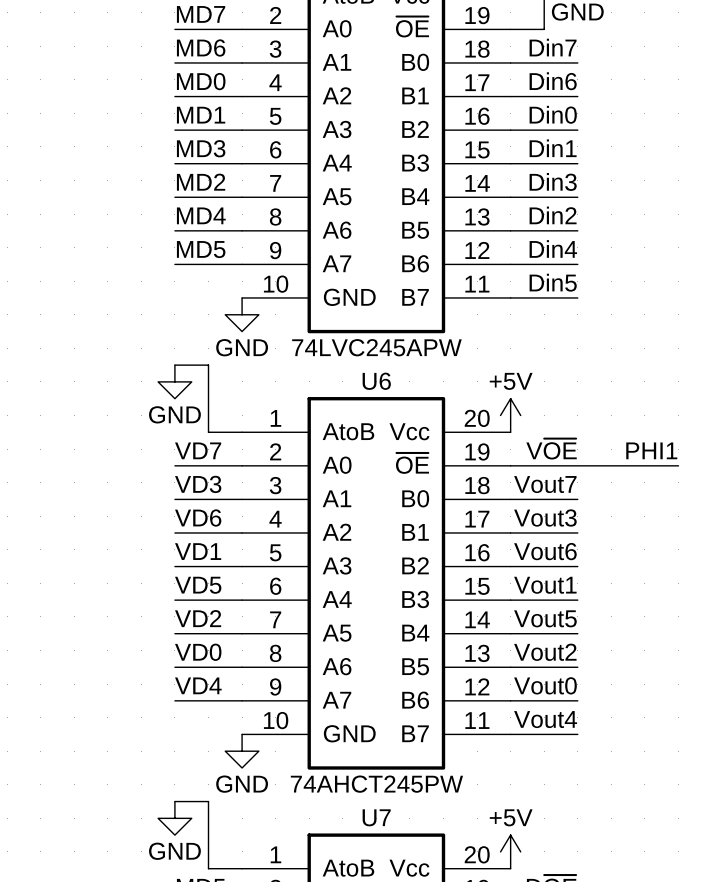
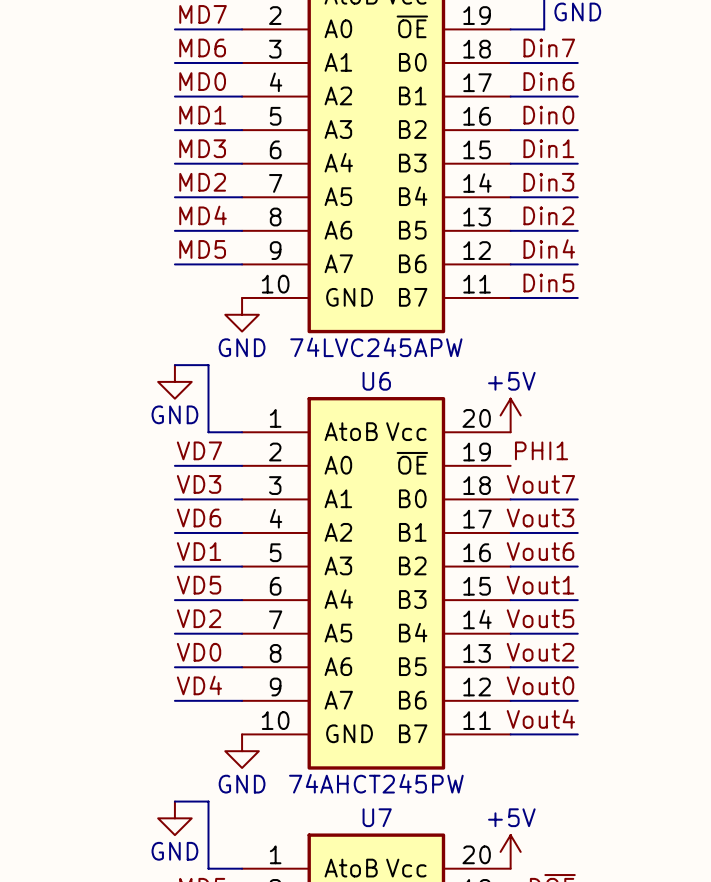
label: V~{OE} (551, 449) -> none
label position: PHI1 (651, 450) -> PHI1 (541, 450)
wire: (510, 465) (678, 465) -> none

